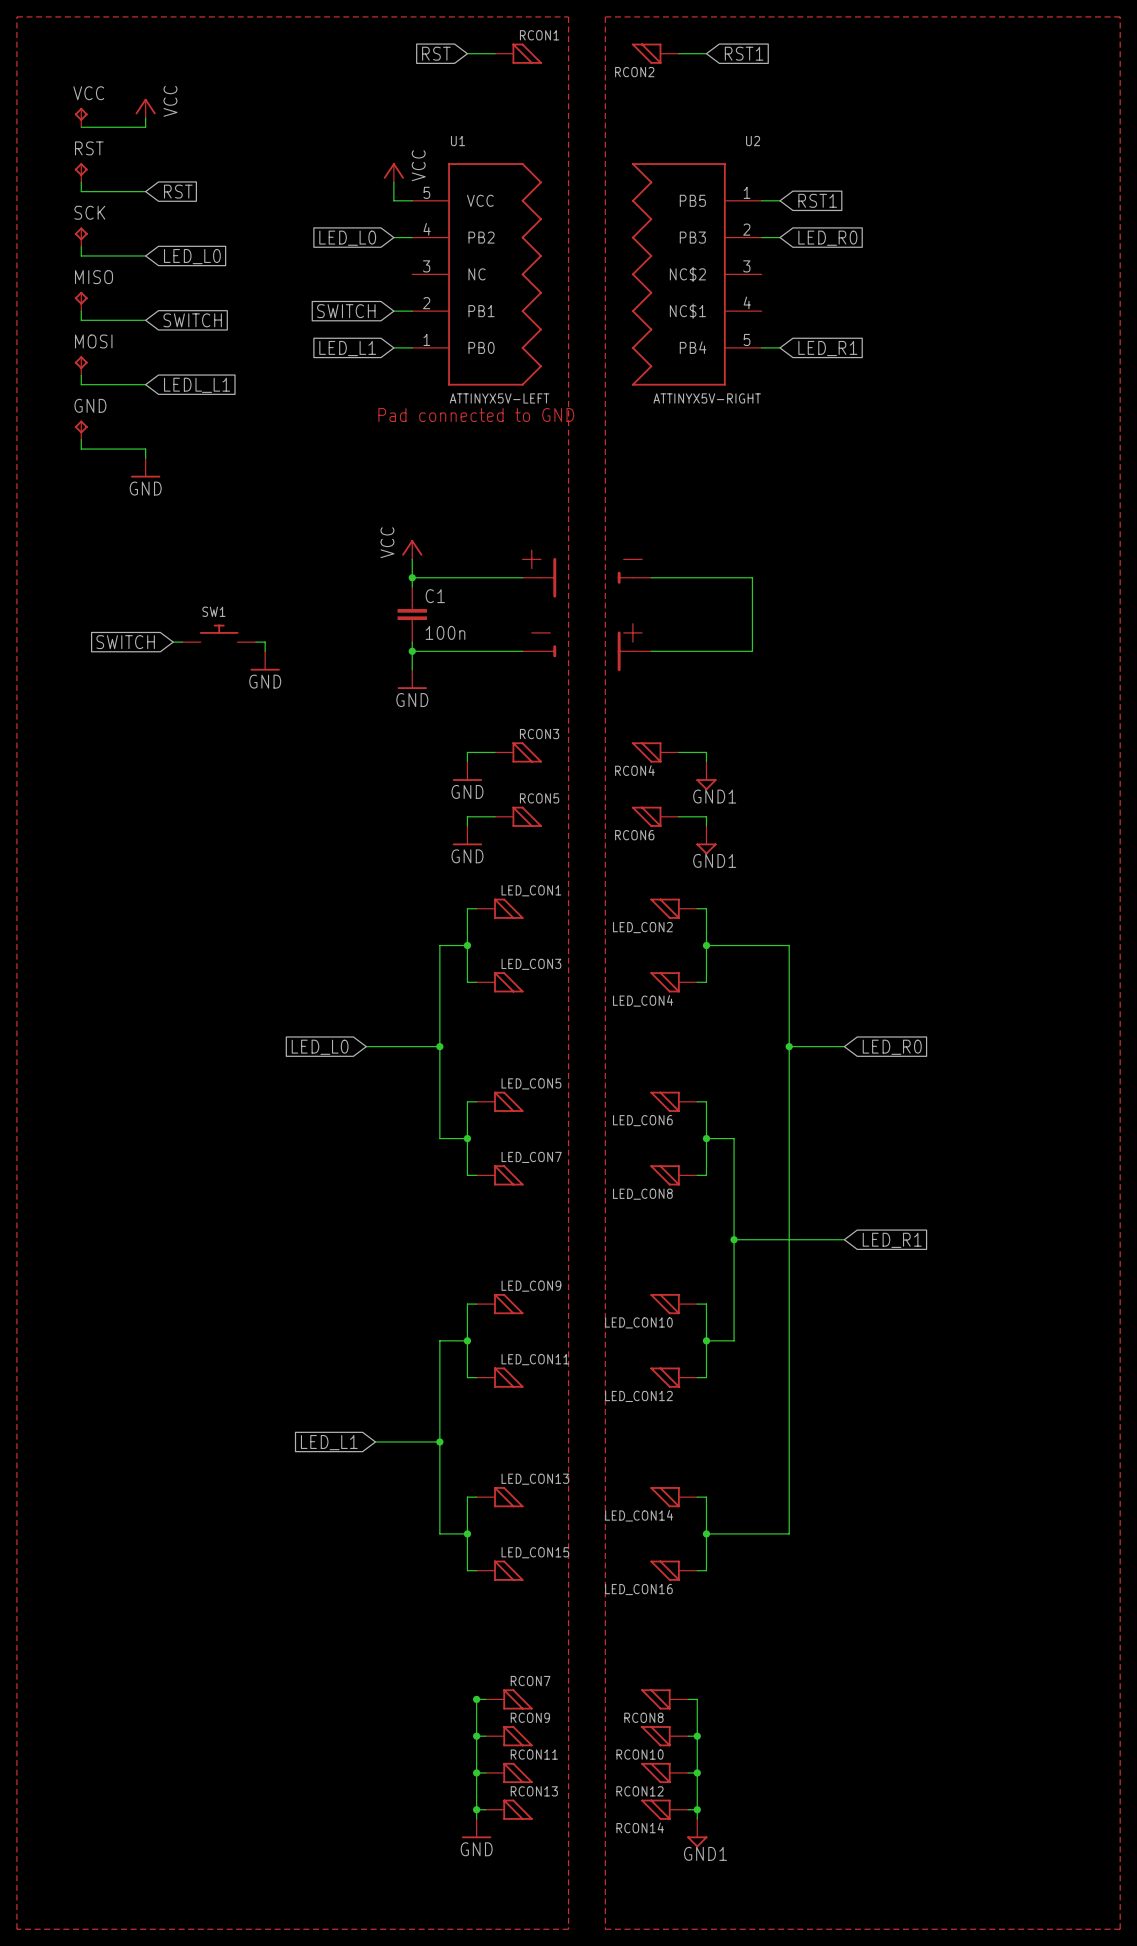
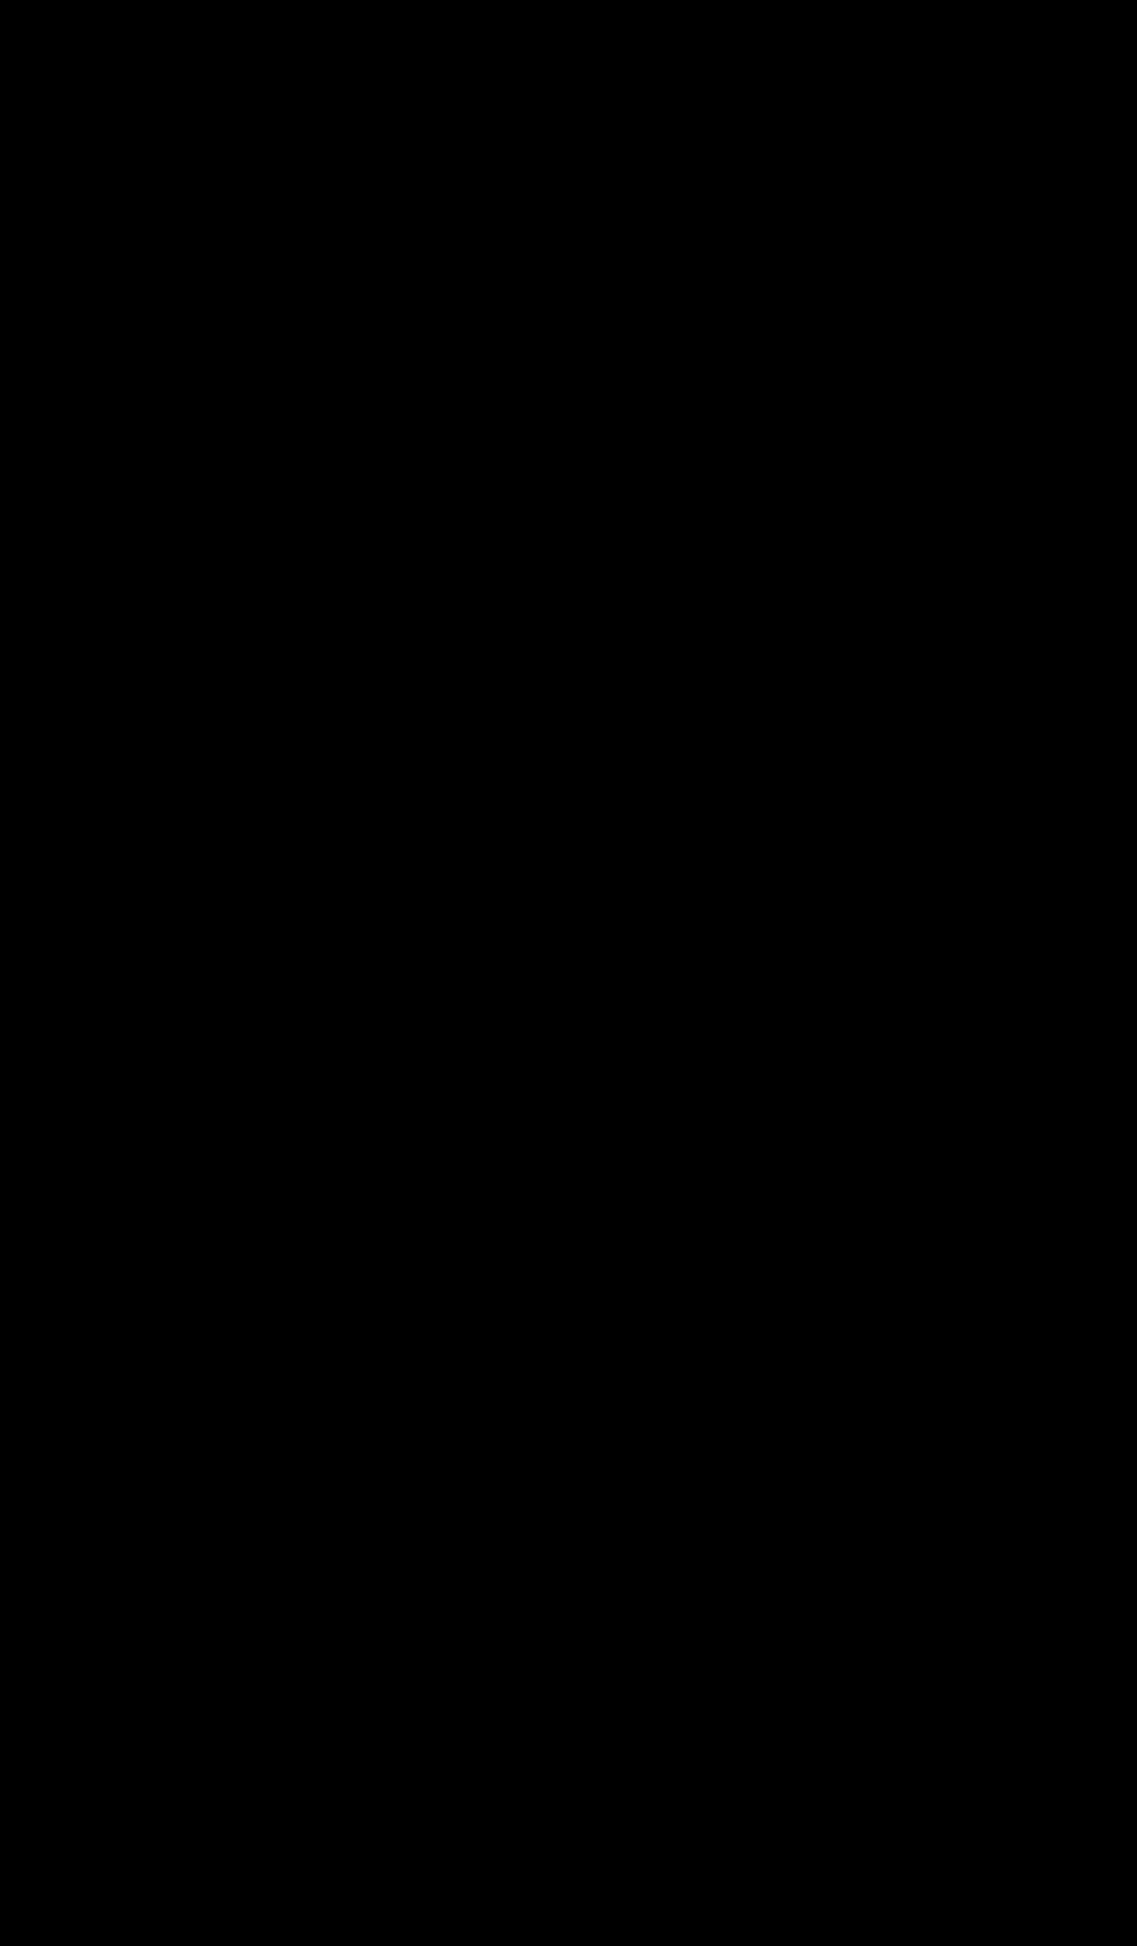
line: (16, 16) (568, 16) (568, 1929) (16, 1929) (16, 16) -> none
line: (605, 16) (1120, 16) (1120, 1929) (605, 1929) (605, 16) -> none
global label: RST (436, 53) -> none
wire: (467, 53) (495, 53) -> none
RCON1: (518, 53) -> none
RCON2: (655, 53) -> none
wire: (678, 53) (706, 53) -> none
global label: RST1 (744, 53) -> none
power symbol: VCC (145, 108) -> none
VCC: (81, 117) -> none
wire: (145, 118) (145, 127) (81, 127) -> none
RST: (81, 172) -> none
power symbol: VCC (393, 172) -> none
wire: (81, 182) (81, 191) (145, 191) -> none
wire: (393, 182) (393, 200) (412, 200) -> none
global label: RST (178, 191) -> none
wire: (761, 200) (780, 200) -> none
global label: RST1 (817, 200) -> none
SCK: (81, 237) -> none
wire: (393, 237) (412, 237) -> none
wire: (761, 237) (780, 237) -> none
global label: LED_L0 (347, 238) -> none
global label: LED_R0 (827, 238) -> none
wire: (81, 246) (81, 255) (145, 255) -> none
global label: LED_L0 (192, 256) -> none
U1: ATTINYX5V-LEFT (477, 274) -> none
U2: ATTINYX5V-RIGHT (696, 274) -> none
MISO: (81, 301) -> none
wire: (81, 311) (81, 320) (145, 320) -> none
global label: SWITCH (346, 311) -> none
wire: (393, 311) (412, 311) -> none
global label: SWITCH (192, 320) -> none
wire: (393, 347) (412, 347) -> none
wire: (761, 347) (780, 347) -> none
global label: LED_L1 (347, 348) -> none
global label: LED_R1 (827, 348) -> none
MOSI: (81, 365) -> none
wire: (81, 375) (81, 384) (145, 384) -> none
global label: LEDL_L1 (197, 385) -> none
text: Pad connected to GND (476, 415) -> none
GND: (81, 430) -> none
wire: (81, 439) (81, 449) (145, 449) (145, 458) -> none
power symbol: GND (145, 467) -> none
power symbol: VCC (412, 549) -> none
line: (531, 550) (531, 568) -> none
wire: (412, 559) (412, 586) -> none
line: (522, 559) (540, 559) -> none
line: (623, 559) (642, 559) -> none
wire: (412, 577) (522, 577) -> none
junction: (412, 577) -> none
part: (539, 577) -> none
part: (634, 577) -> none
wire: (651, 577) (752, 577) (752, 651) (651, 651) -> none
C1: 100n (412, 614) -> none
line: (632, 623) (632, 642) -> none
line: (531, 632) (550, 632) -> none
line: (623, 632) (642, 632) -> none
SW1: (219, 633) -> none
global label: SWITCH (125, 642) -> none
wire: (173, 642) (182, 642) -> none
wire: (255, 642) (265, 642) (265, 651) -> none
wire: (412, 642) (412, 669) -> none
wire: (412, 651) (522, 651) -> none
junction: (412, 651) -> none
part: (539, 651) -> none
part: (634, 651) -> none
power symbol: GND (265, 660) -> none
power symbol: GND (412, 679) -> none
wire: (495, 752) (467, 752) (467, 761) -> none
RCON3: (518, 752) -> none
RCON4: (655, 752) -> none
wire: (678, 752) (706, 752) (706, 761) -> none
power symbol: GND (467, 771) -> none
power symbol: GND1 (706, 775) -> none
wire: (495, 816) (467, 816) (467, 825) -> none
RCON5: (518, 816) -> none
RCON6: (655, 816) -> none
wire: (678, 816) (706, 816) (706, 825) -> none
power symbol: GND (467, 835) -> none
power symbol: GND1 (706, 840) -> none
wire: (476, 908) (467, 908) (467, 982) (476, 982) -> none
LED_CON1: (500, 908) -> none
LED_CON2: (673, 908) -> none
wire: (697, 908) (706, 908) (706, 982) (697, 982) -> none
wire: (467, 945) (439, 945) (439, 1138) (467, 1138) -> none
junction: (467, 945) -> none
wire: (706, 945) (789, 945) (789, 1533) (706, 1533) -> none
junction: (706, 945) -> none
LED_CON3: (500, 982) -> none
LED_CON4: (673, 982) -> none
wire: (366, 1046) (439, 1046) -> none
junction: (439, 1046) -> none
wire: (789, 1046) (844, 1046) -> none
junction: (789, 1046) -> none
global label: LED_L0 (320, 1047) -> none
global label: LED_R0 (892, 1047) -> none
wire: (476, 1101) (467, 1101) (467, 1175) (476, 1175) -> none
LED_CON5: (500, 1101) -> none
LED_CON6: (673, 1101) -> none
wire: (697, 1101) (706, 1101) (706, 1175) (697, 1175) -> none
junction: (467, 1138) -> none
wire: (706, 1138) (734, 1138) (734, 1340) (706, 1340) -> none
junction: (706, 1138) -> none
LED_CON7: (500, 1175) -> none
LED_CON8: (673, 1175) -> none
wire: (734, 1239) (844, 1239) -> none
junction: (734, 1239) -> none
global label: LED_R1 (892, 1240) -> none
wire: (476, 1304) (467, 1304) (467, 1377) (476, 1377) -> none
LED_CON9: (500, 1304) -> none
LED_CON10: (673, 1304) -> none
wire: (697, 1304) (706, 1304) (706, 1377) (697, 1377) -> none
wire: (467, 1340) (439, 1340) (439, 1533) (467, 1533) -> none
junction: (467, 1340) -> none
junction: (706, 1340) -> none
LED_CON11: (500, 1377) -> none
LED_CON12: (673, 1377) -> none
wire: (375, 1441) (439, 1441) -> none
junction: (439, 1441) -> none
global label: LED_L1 (329, 1442) -> none
wire: (476, 1497) (467, 1497) (467, 1570) (476, 1570) -> none
LED_CON13: (500, 1497) -> none
LED_CON14: (673, 1497) -> none
wire: (697, 1497) (706, 1497) (706, 1570) (697, 1570) -> none
junction: (467, 1533) -> none
junction: (706, 1533) -> none
LED_CON15: (500, 1570) -> none
LED_CON16: (673, 1570) -> none
junction: (476, 1699) -> none
wire: (485, 1699) (476, 1699) (476, 1818) -> none
RCON7: (509, 1699) -> none
RCON8: (664, 1699) -> none
wire: (688, 1699) (697, 1699) (697, 1818) -> none
wire: (476, 1736) (485, 1736) -> none
junction: (476, 1736) -> none
RCON9: (509, 1736) -> none
RCON10: (664, 1736) -> none
wire: (688, 1736) (697, 1736) -> none
junction: (697, 1736) -> none
wire: (476, 1772) (485, 1772) -> none
junction: (476, 1772) -> none
RCON11: (509, 1772) -> none
RCON12: (664, 1772) -> none
wire: (688, 1772) (697, 1772) -> none
junction: (697, 1772) -> none
wire: (476, 1809) (485, 1809) -> none
junction: (476, 1809) -> none
RCON13: (509, 1809) -> none
RCON14: (664, 1809) -> none
wire: (688, 1809) (697, 1809) -> none
junction: (697, 1809) -> none
power symbol: GND (476, 1828) -> none
power symbol: GND1 (697, 1833) -> none

